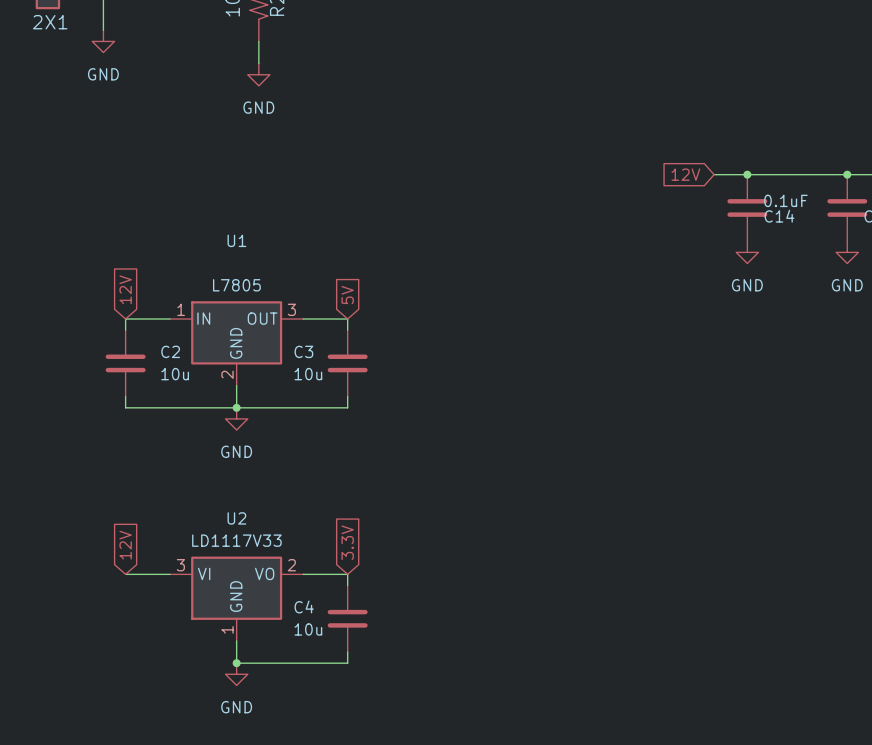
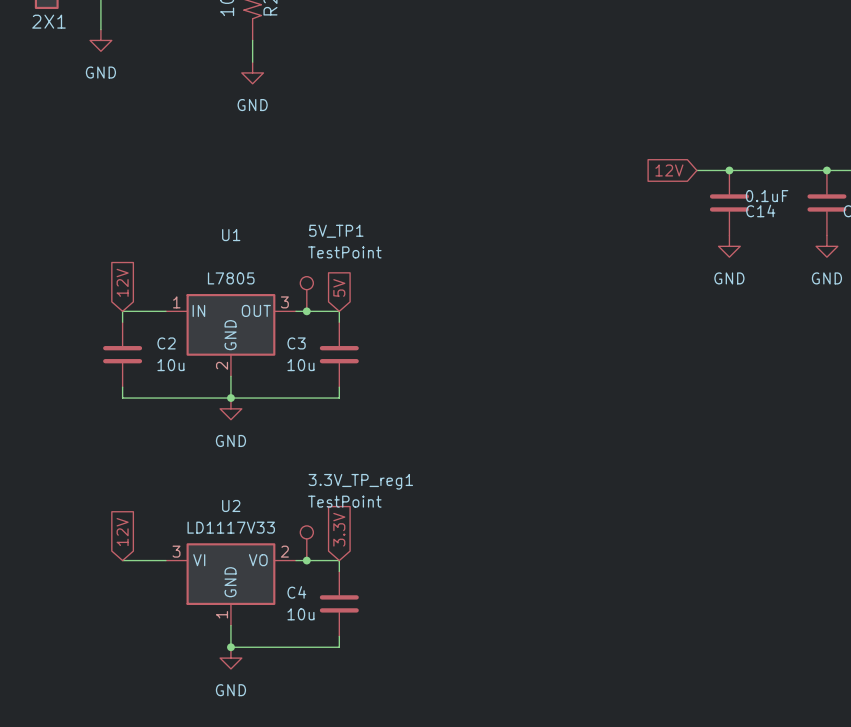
5V_TP1: none -> TestPoint (306, 294)
junction: none -> (306, 311)
3.3V_TP_reg1: none -> TestPoint (306, 543)
junction: none -> (306, 560)

